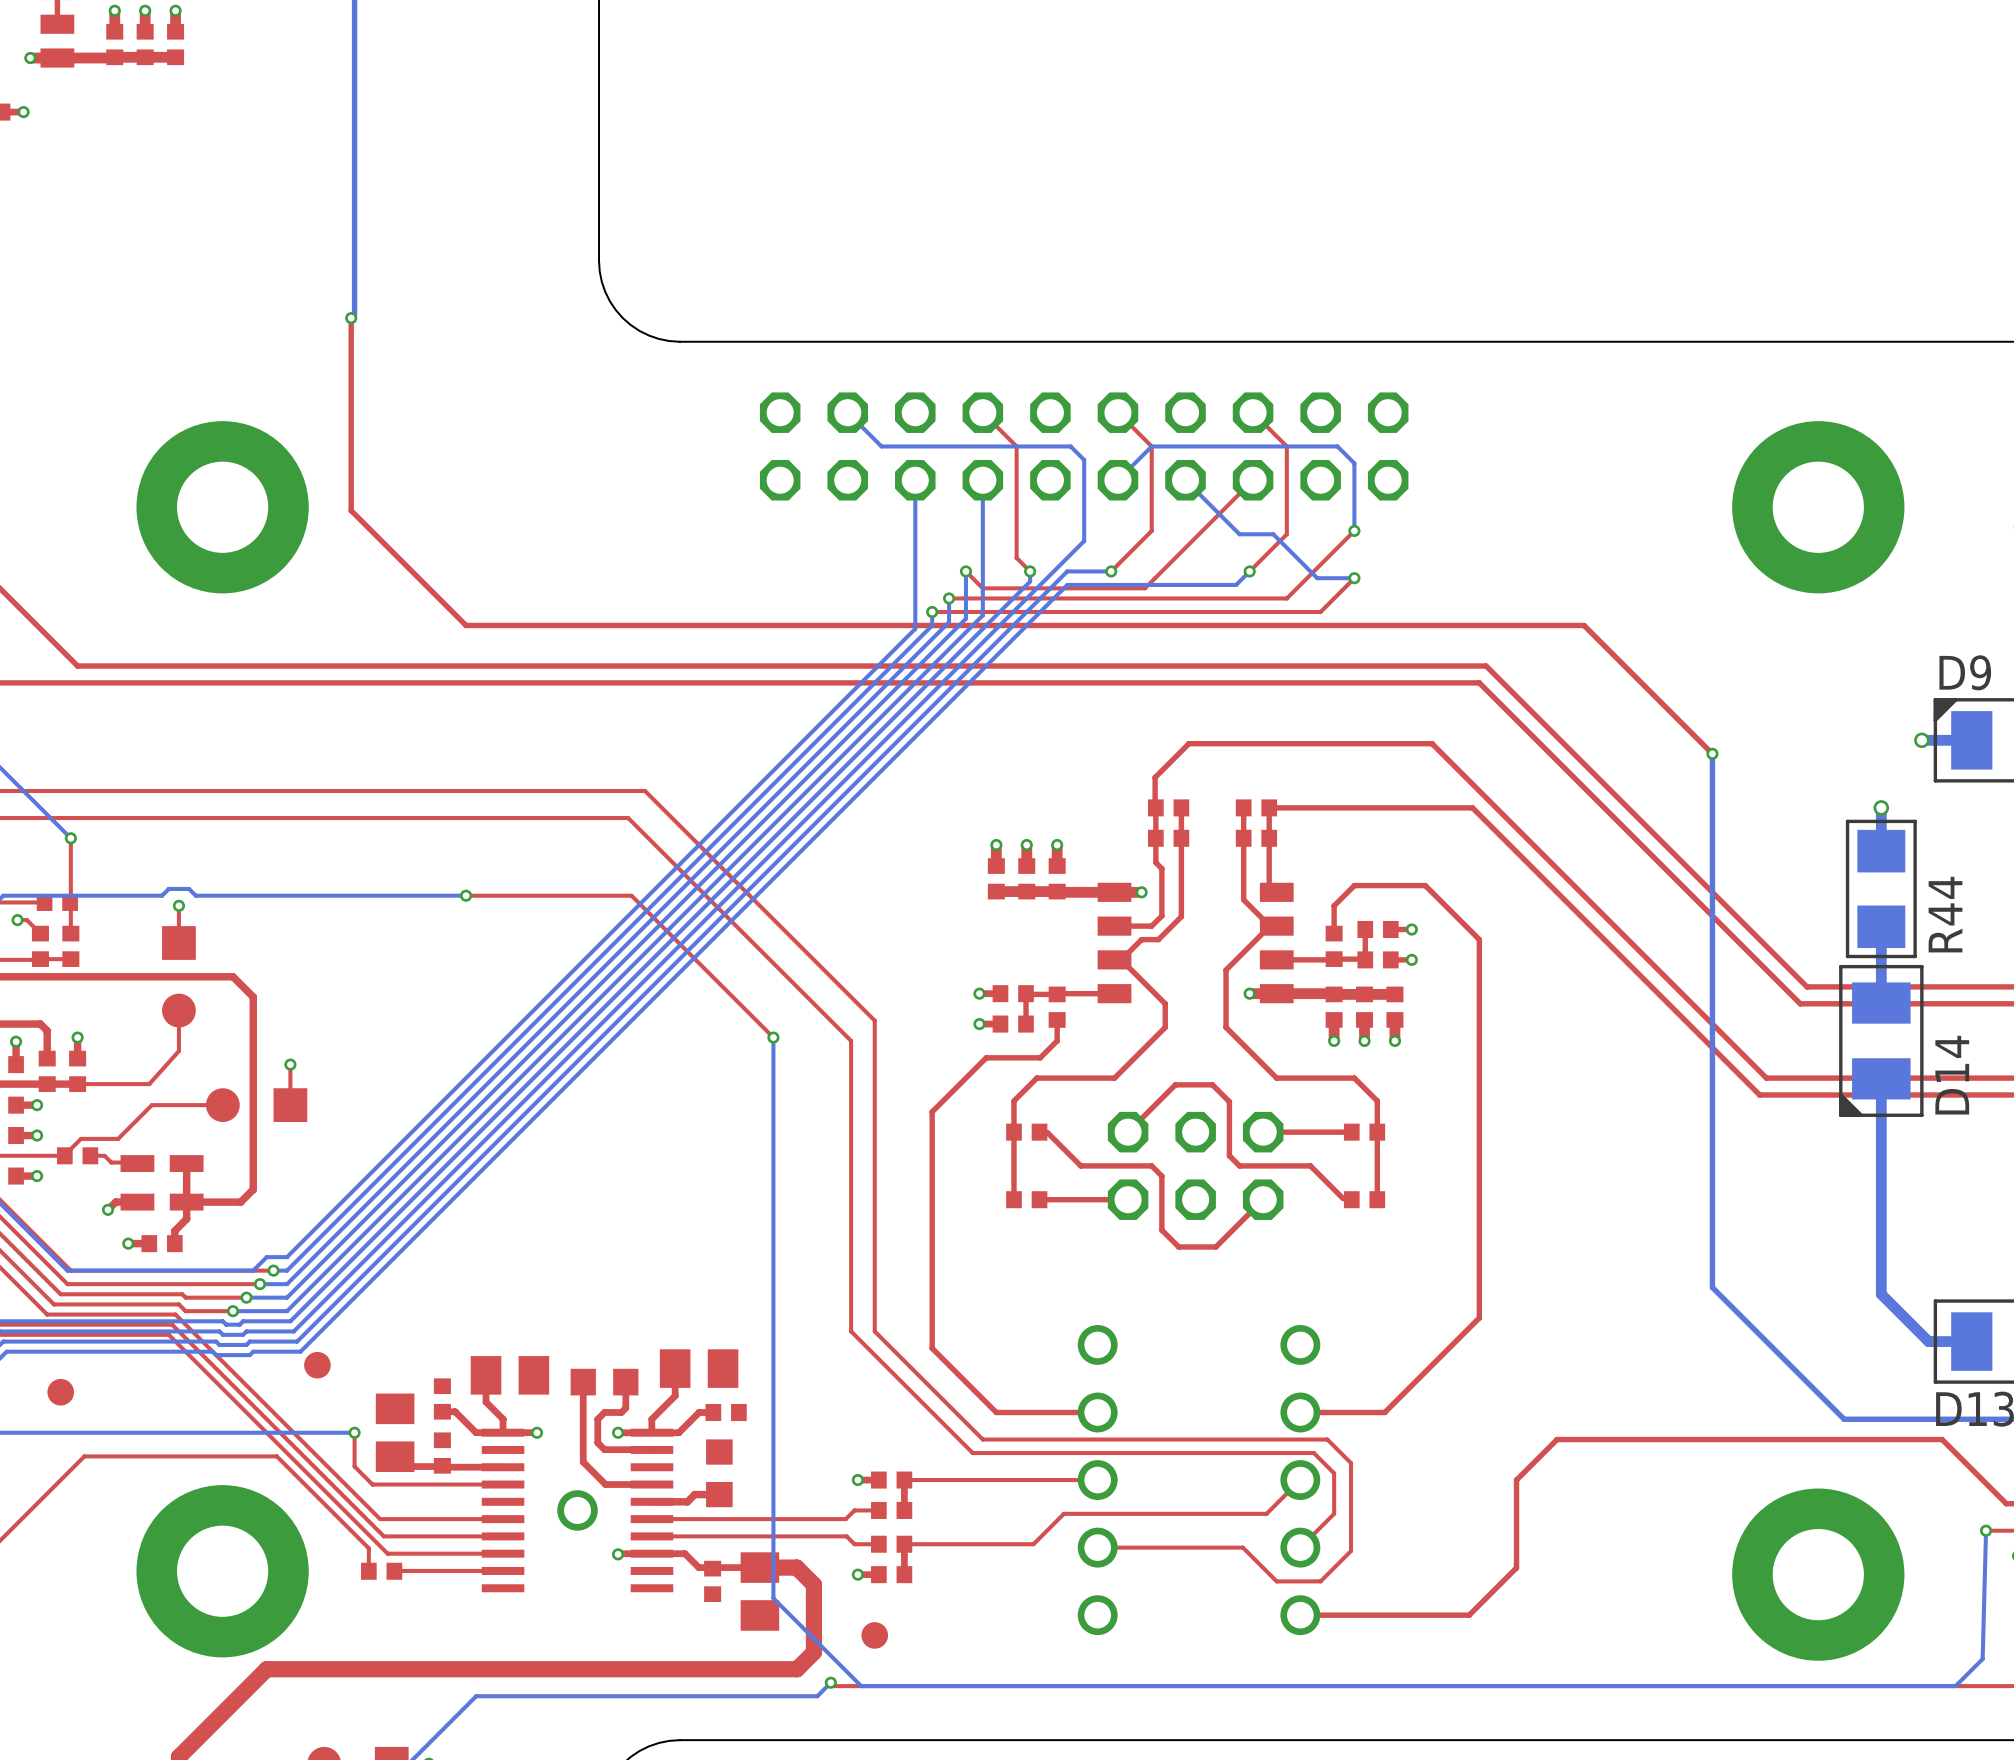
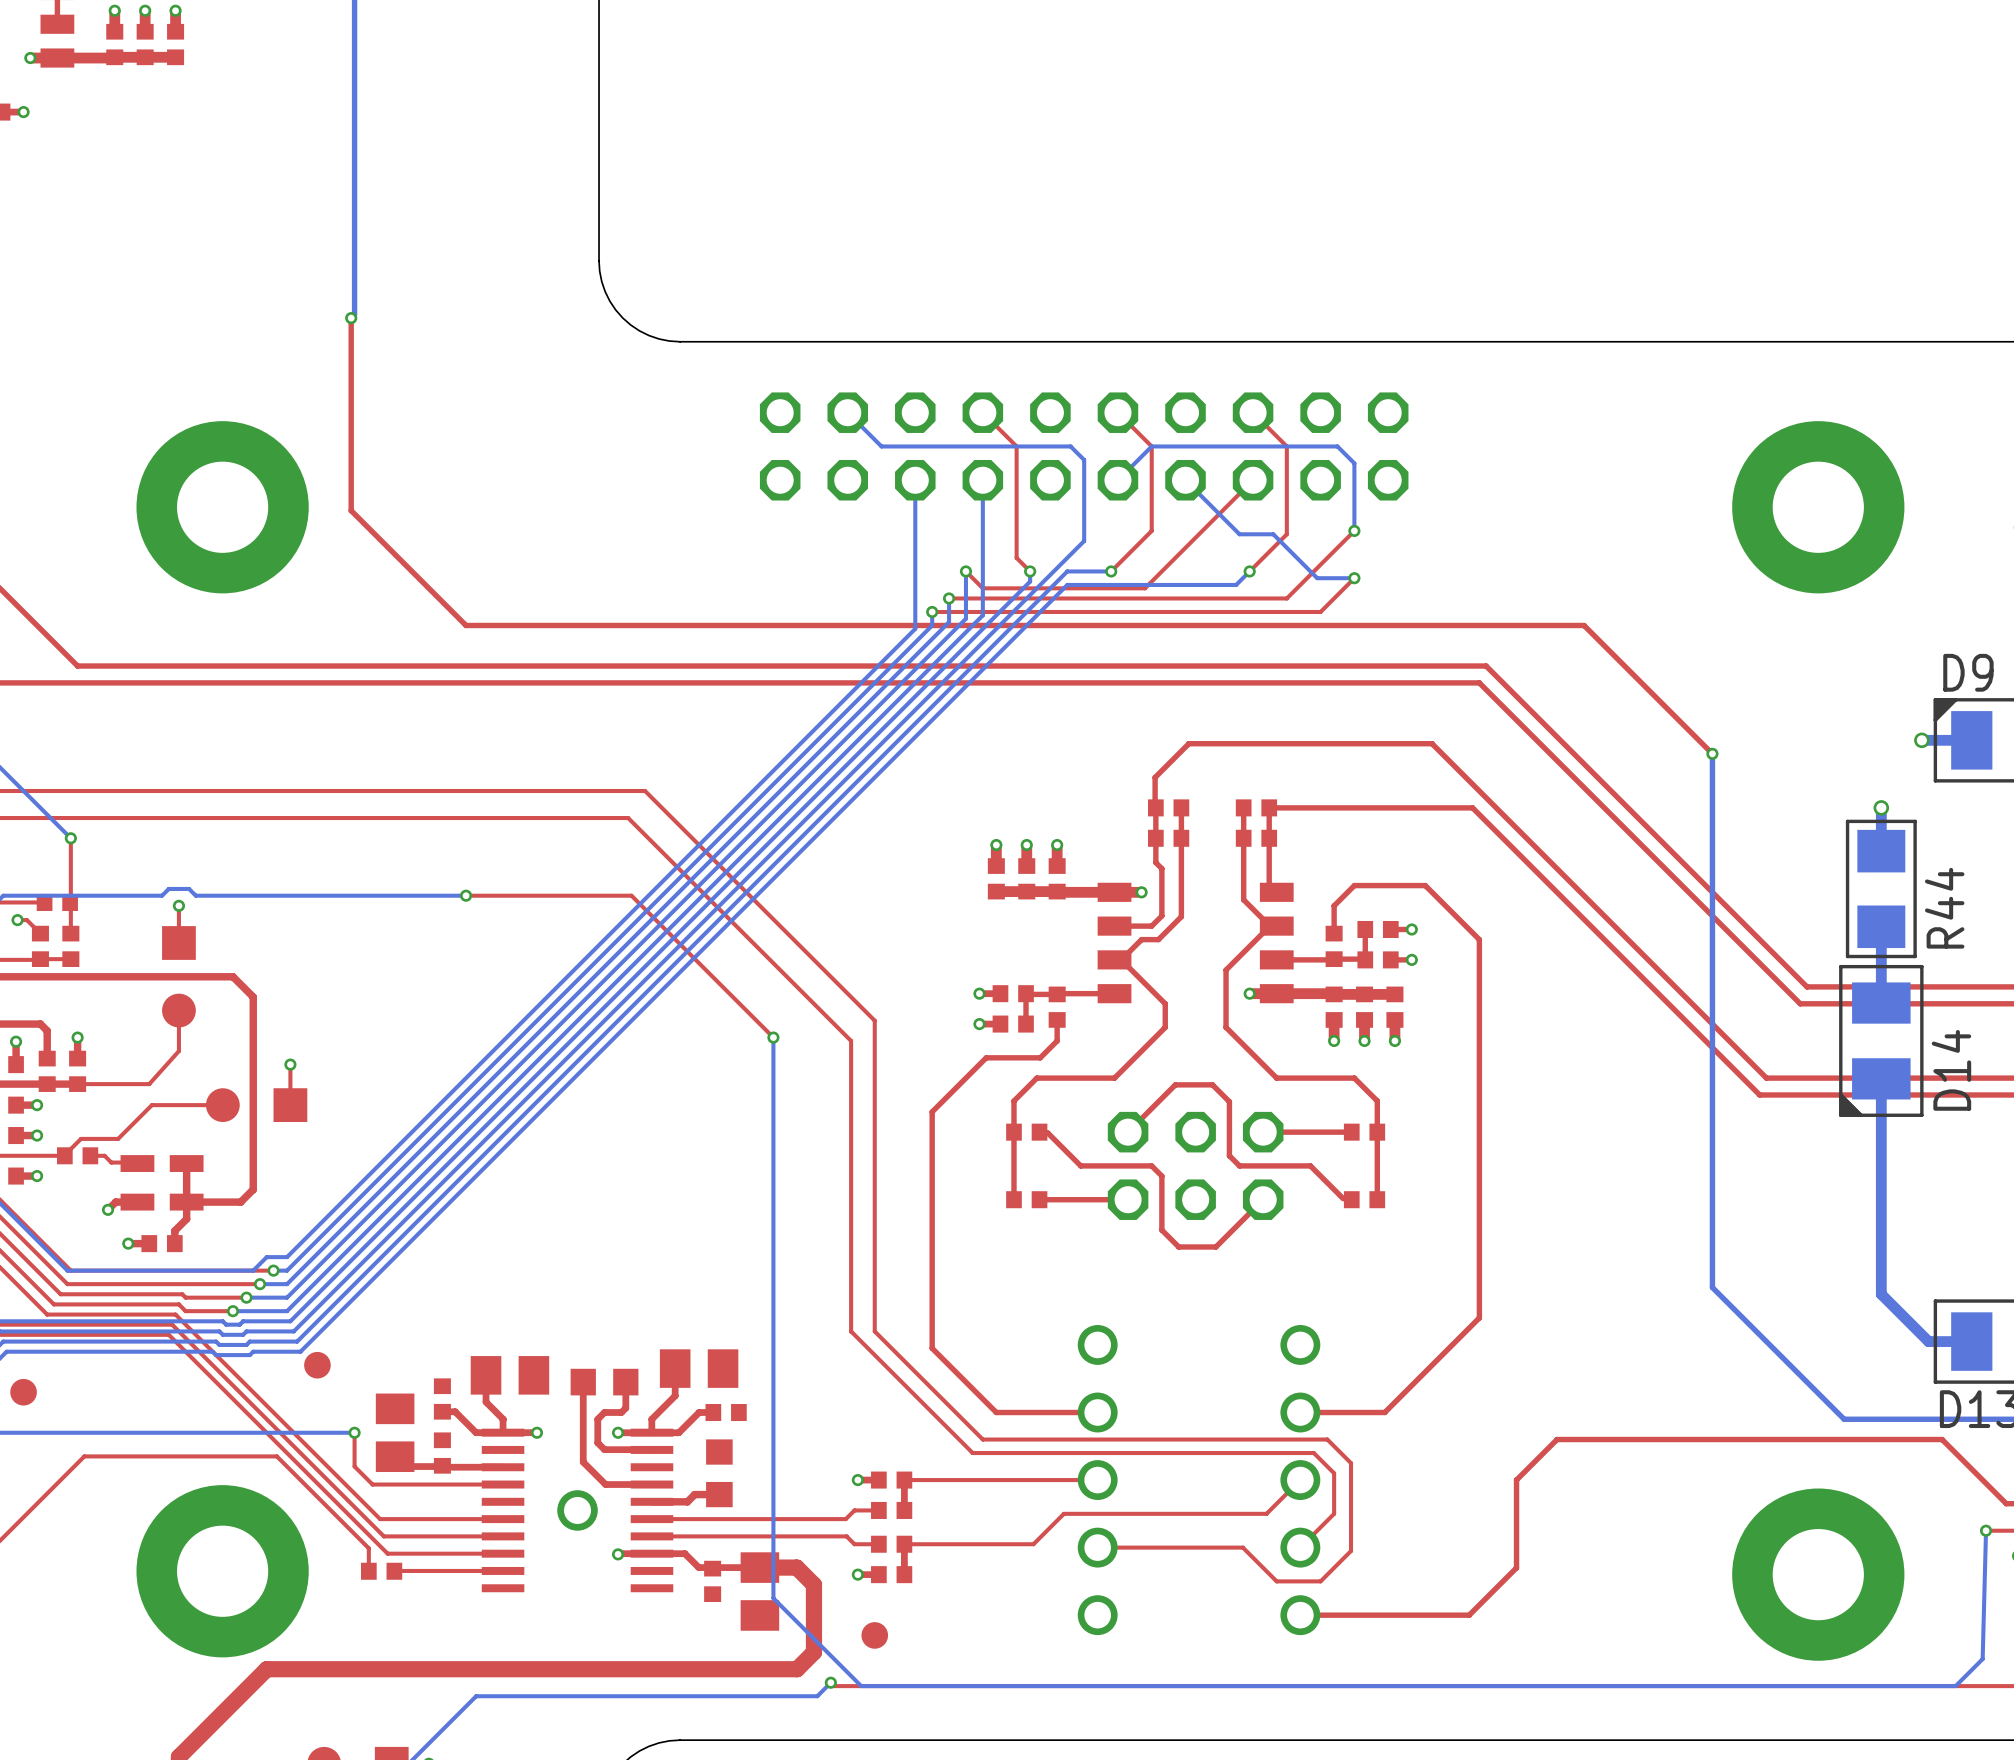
part position: (60, 1392) -> (23, 1392)

